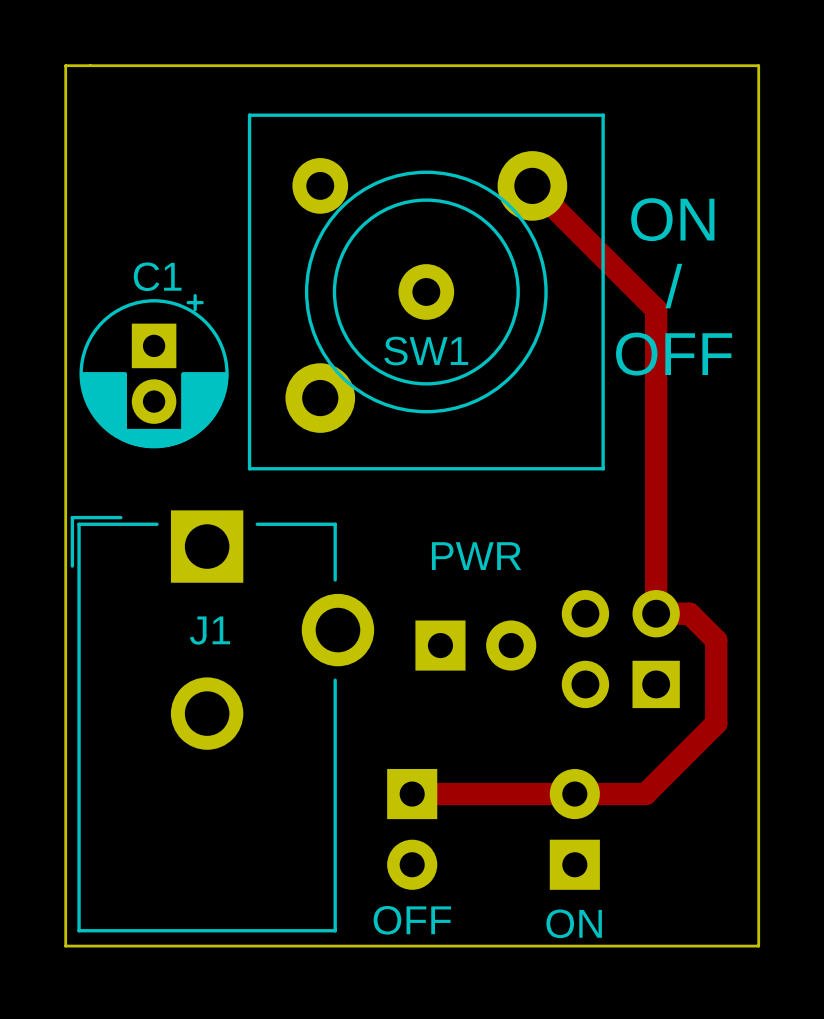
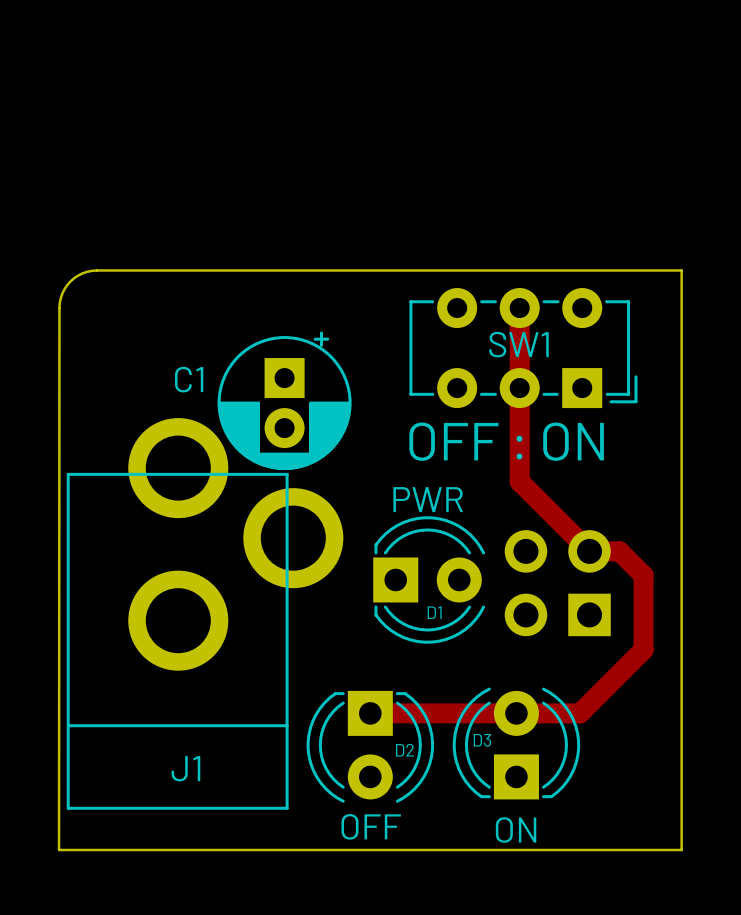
SW1 footprint: [247, 113, 605, 471] -> [409, 288, 638, 409]
track: (532, 185) (656, 309) (656, 613) -> (519, 308) (519, 481) (589, 551)
text: ON (672, 219) -> none
C1 name position: C1 (157, 276) -> C1 (189, 379)
text: / (673, 286) -> none
board edge: (758, 301) (758, 65) (65, 65) (65, 946) -> (681, 270) (96, 270) (82, 273) (70, 281) (62, 293) (59, 308) (59, 849)
SW1 name position: SW1 (426, 351) -> SW1 (518, 344)
text: OFF (674, 354) -> none
C1 position: (154, 371) -> (284, 400)
text: none -> OFF : ON (506, 441)
J1 footprint: [70, 510, 375, 933] -> [66, 418, 344, 810]
J1 name position: J1 (209, 630) -> J1 (185, 768)
D1 side: bottom (475, 645) -> top (429, 579)
D2 side: bottom (412, 829) -> top (370, 746)
D3 side: bottom (574, 829) -> top (516, 743)

